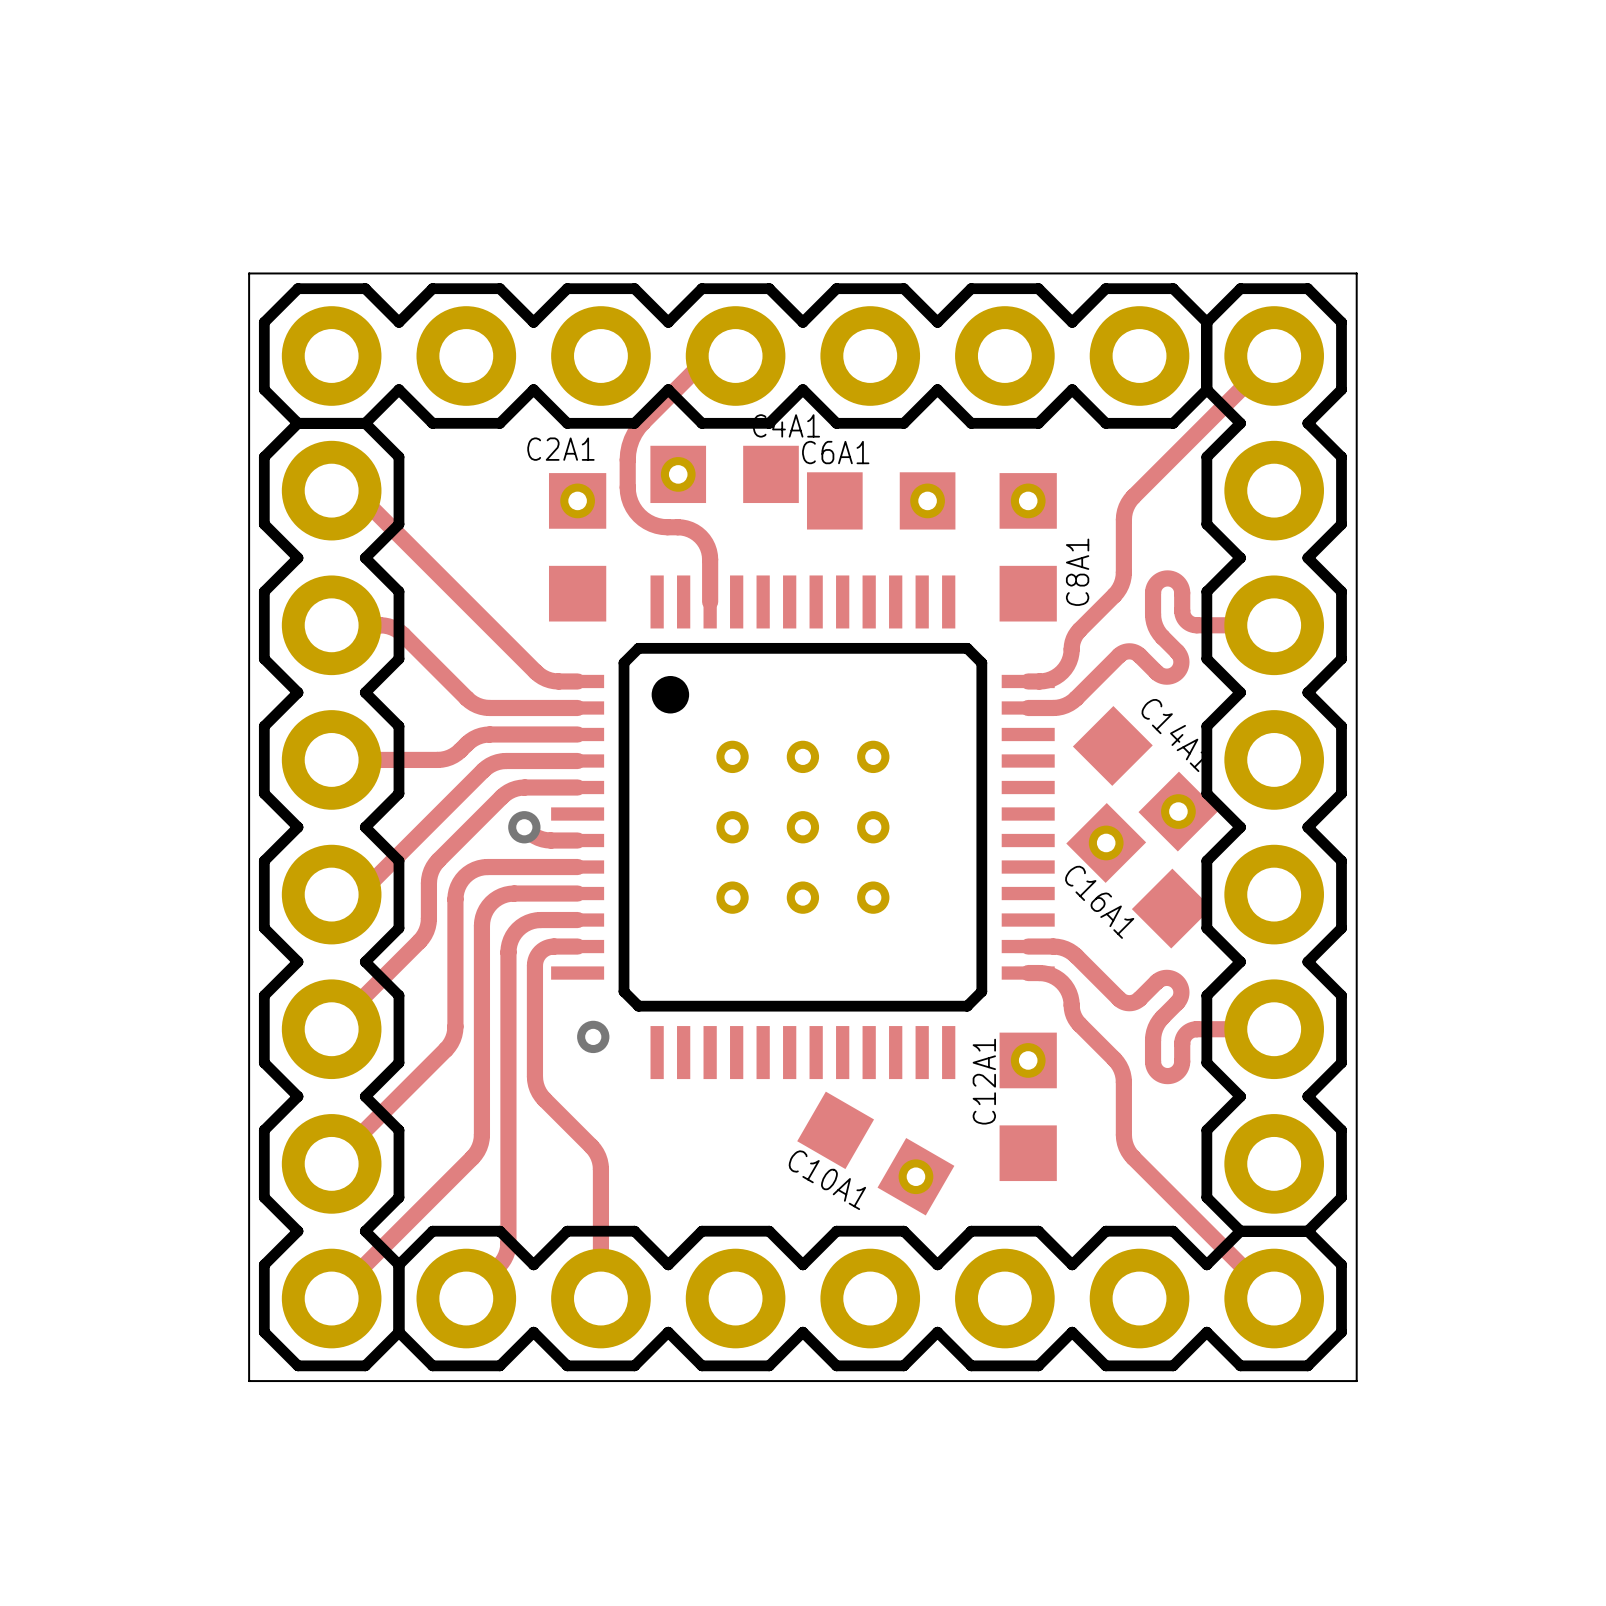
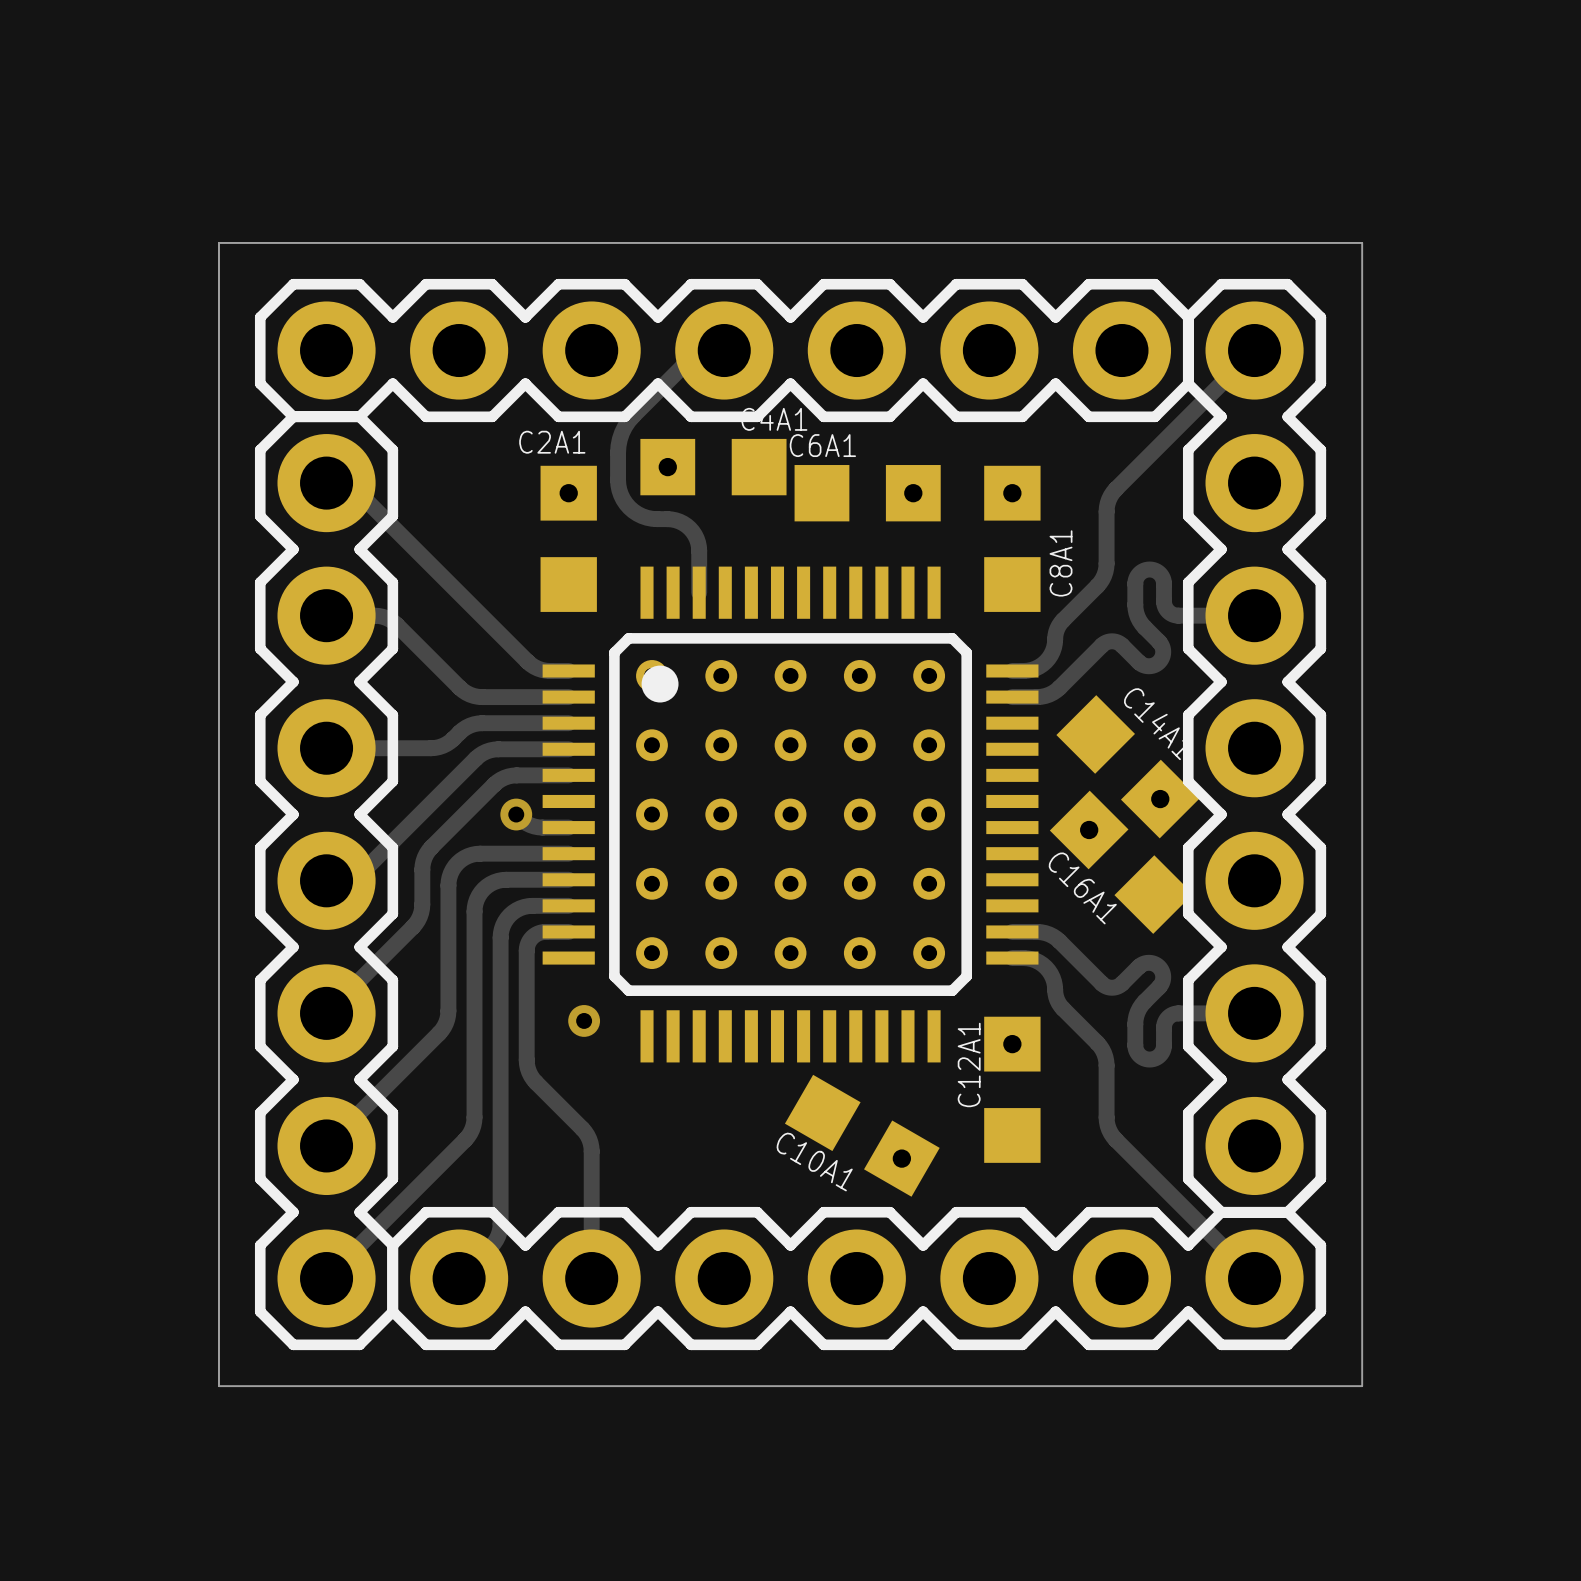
board edge: (249, 273) (249, 1381) (1356, 1381) (1356, 273) (249, 273) -> (218, 242) (218, 1386) (1362, 1386) (1362, 242) (218, 242)
part footprint: [551, 575, 1055, 1080] -> [542, 566, 1039, 1063]

